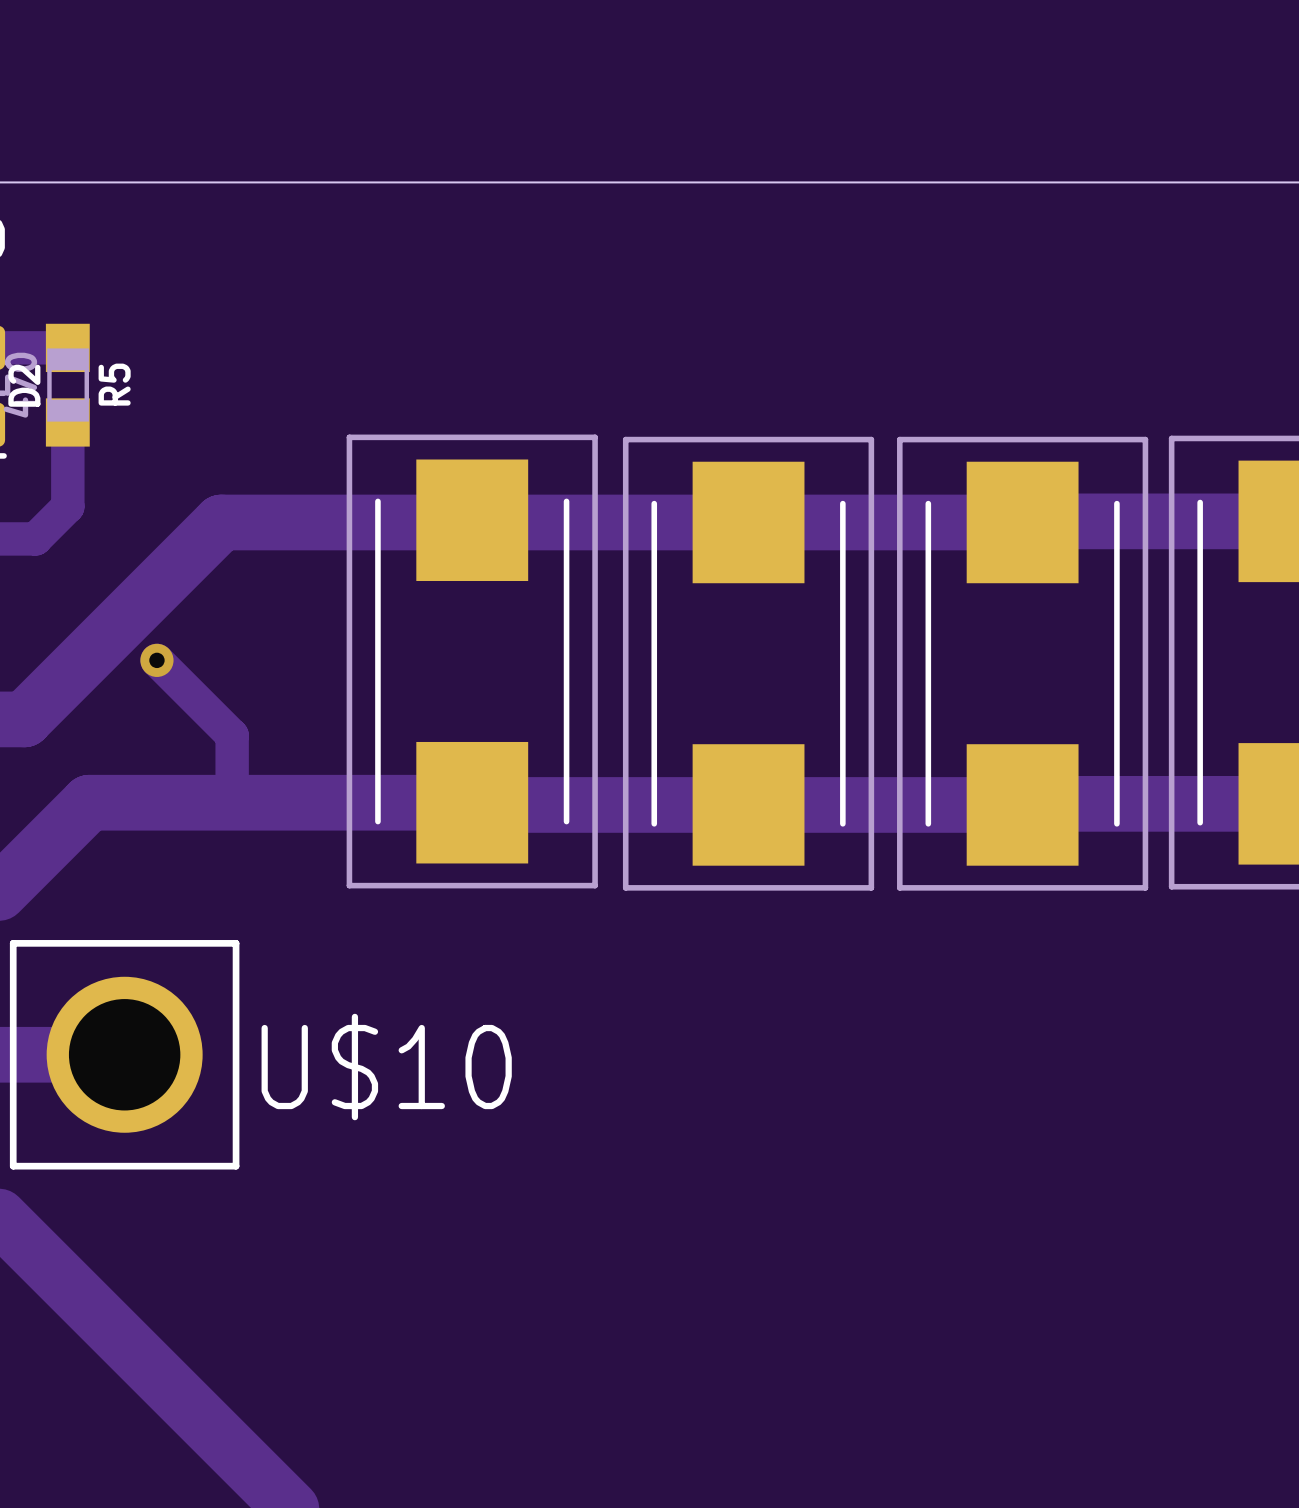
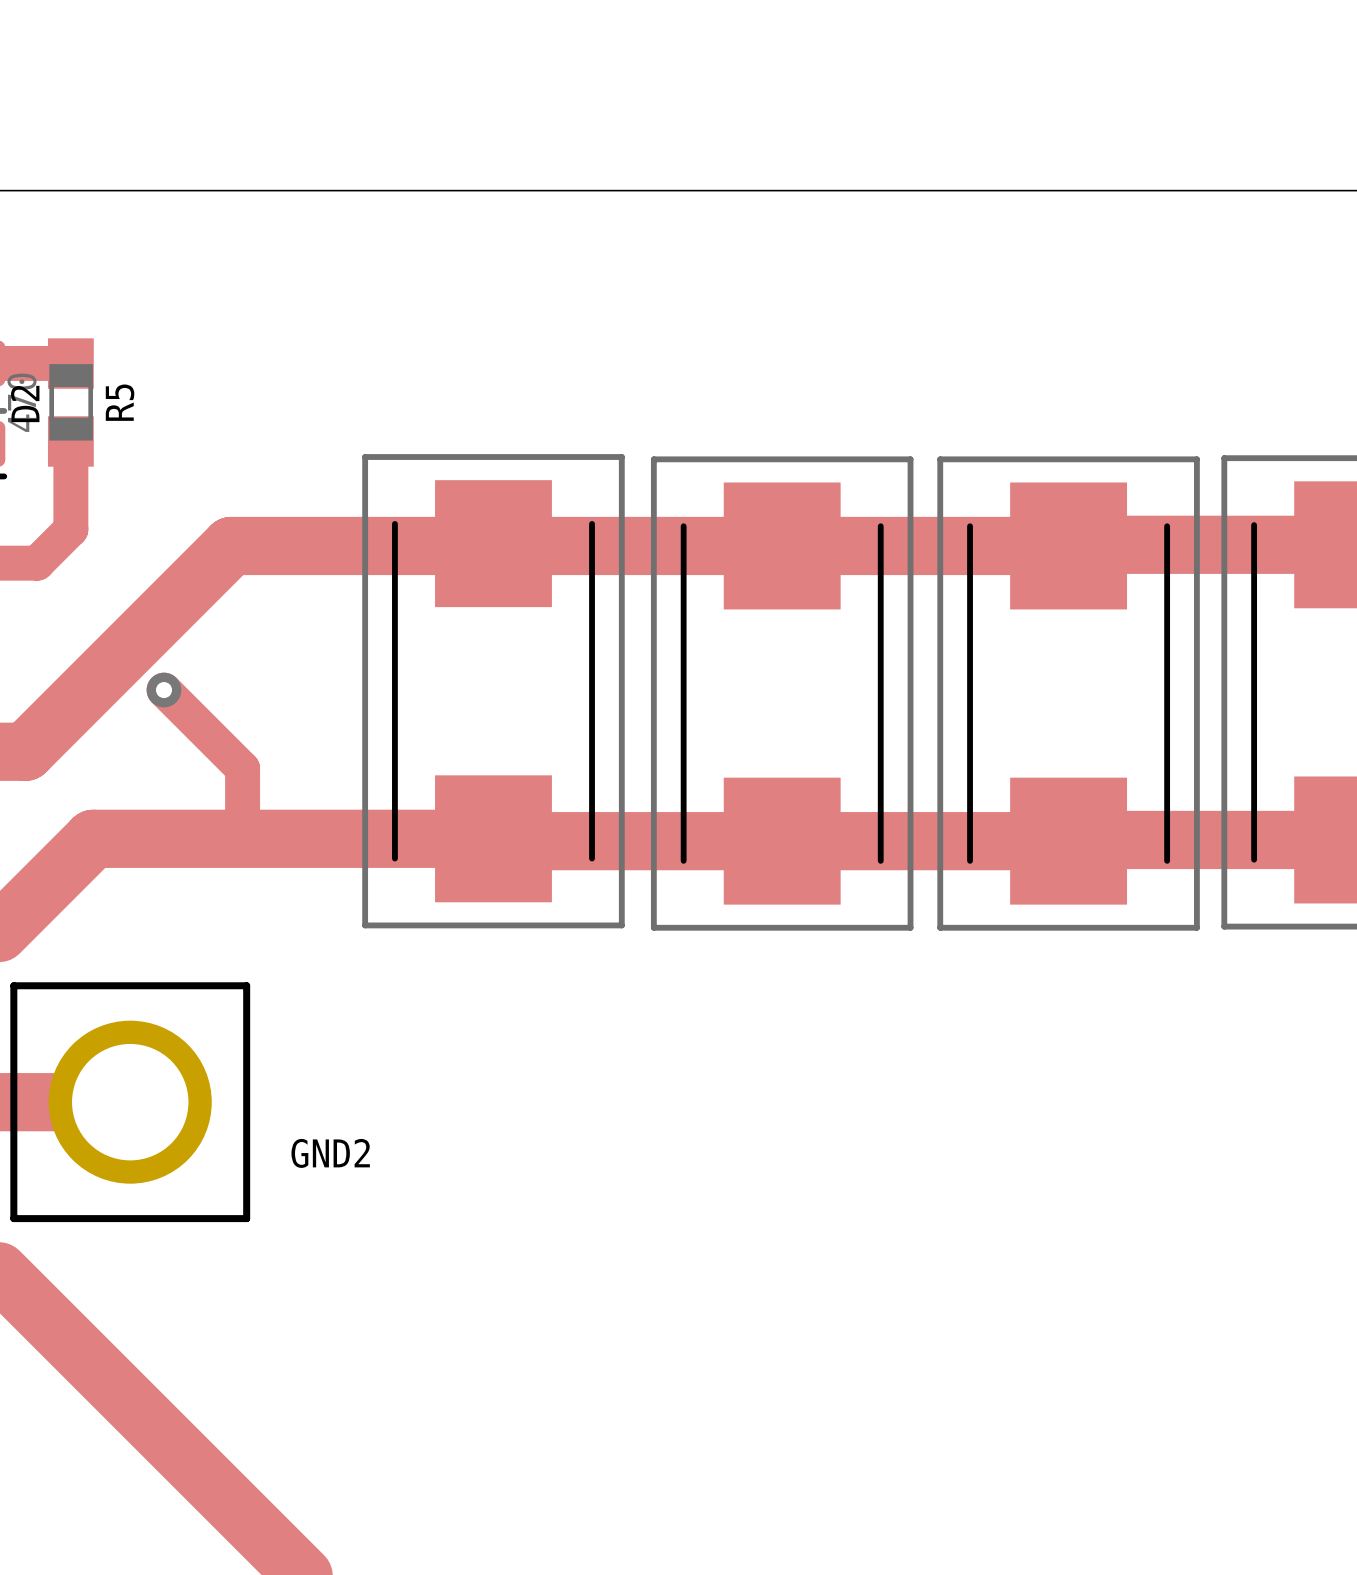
U$10 name: U$10 (386, 1067) -> GND2 (330, 1153)

